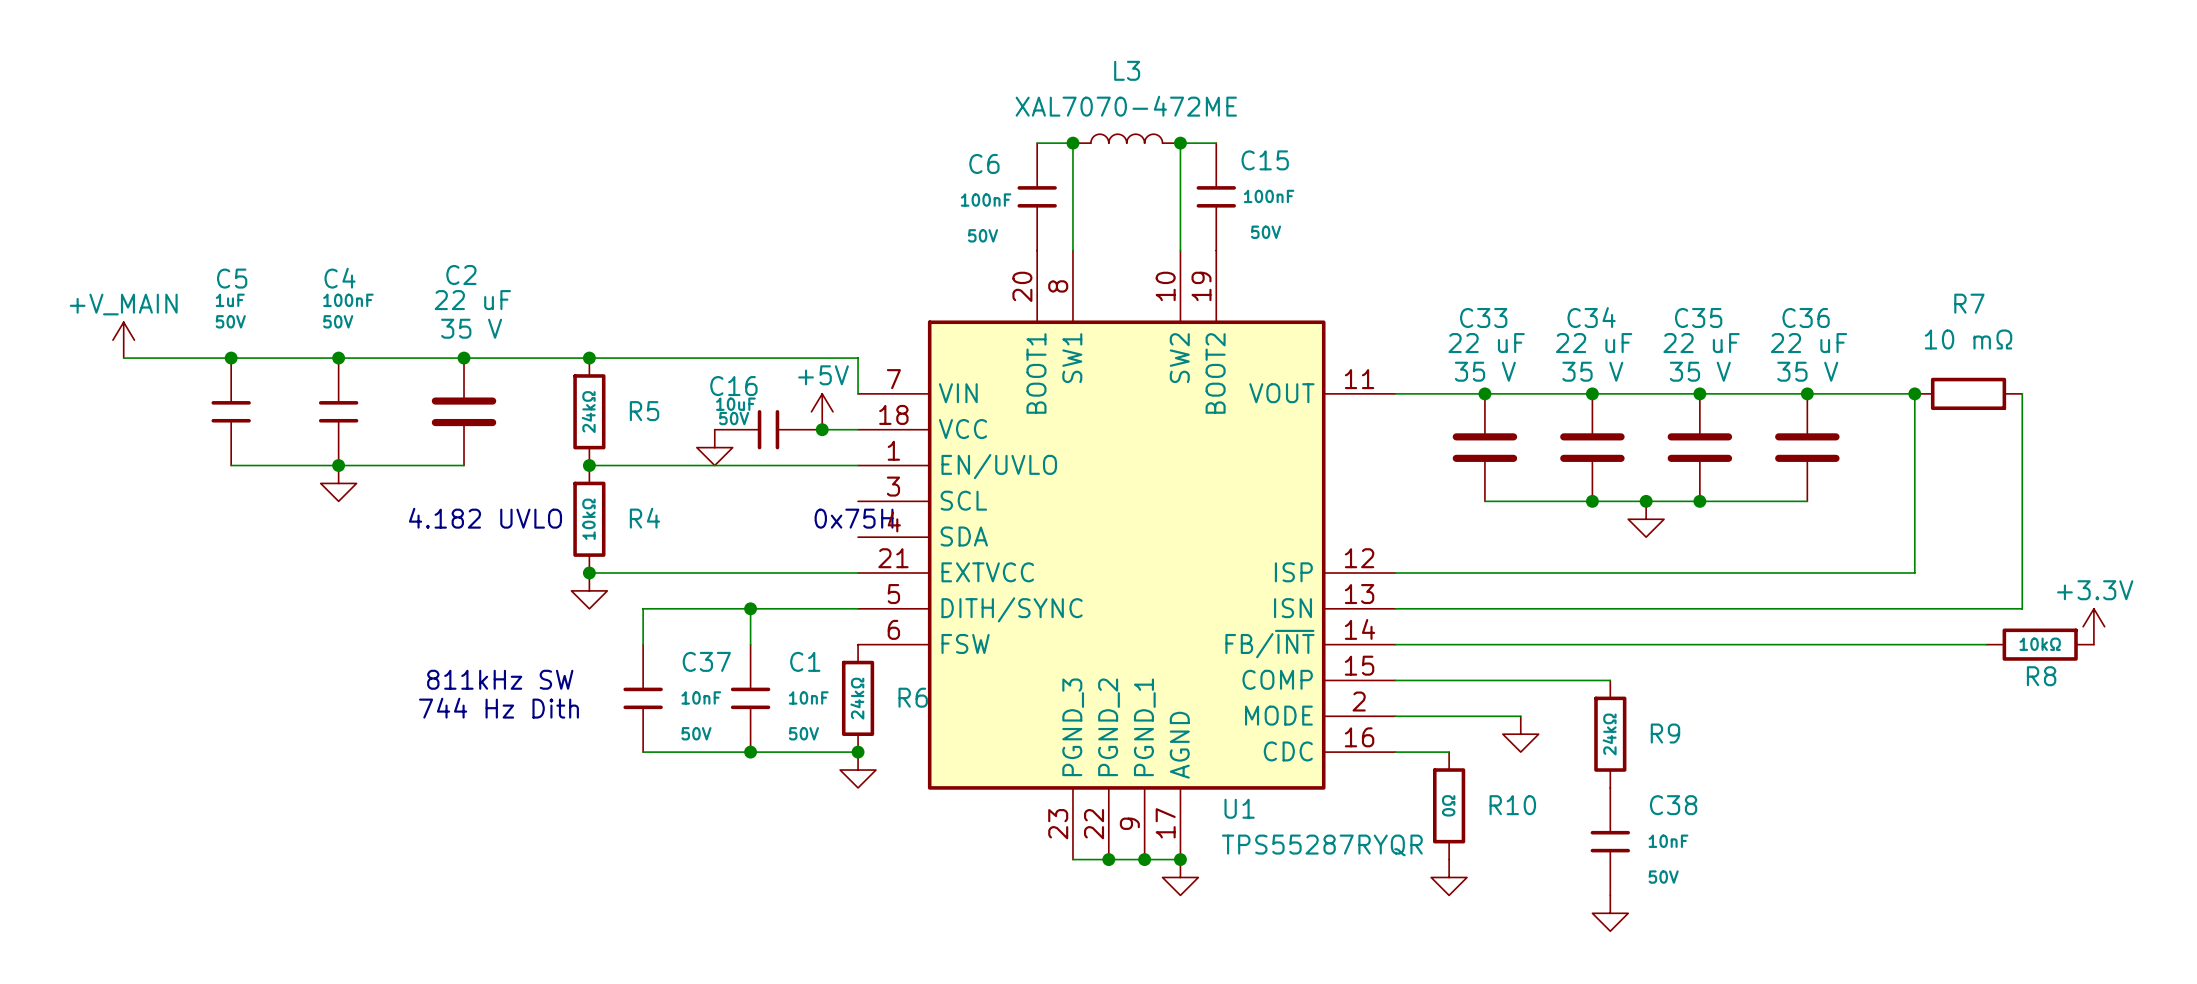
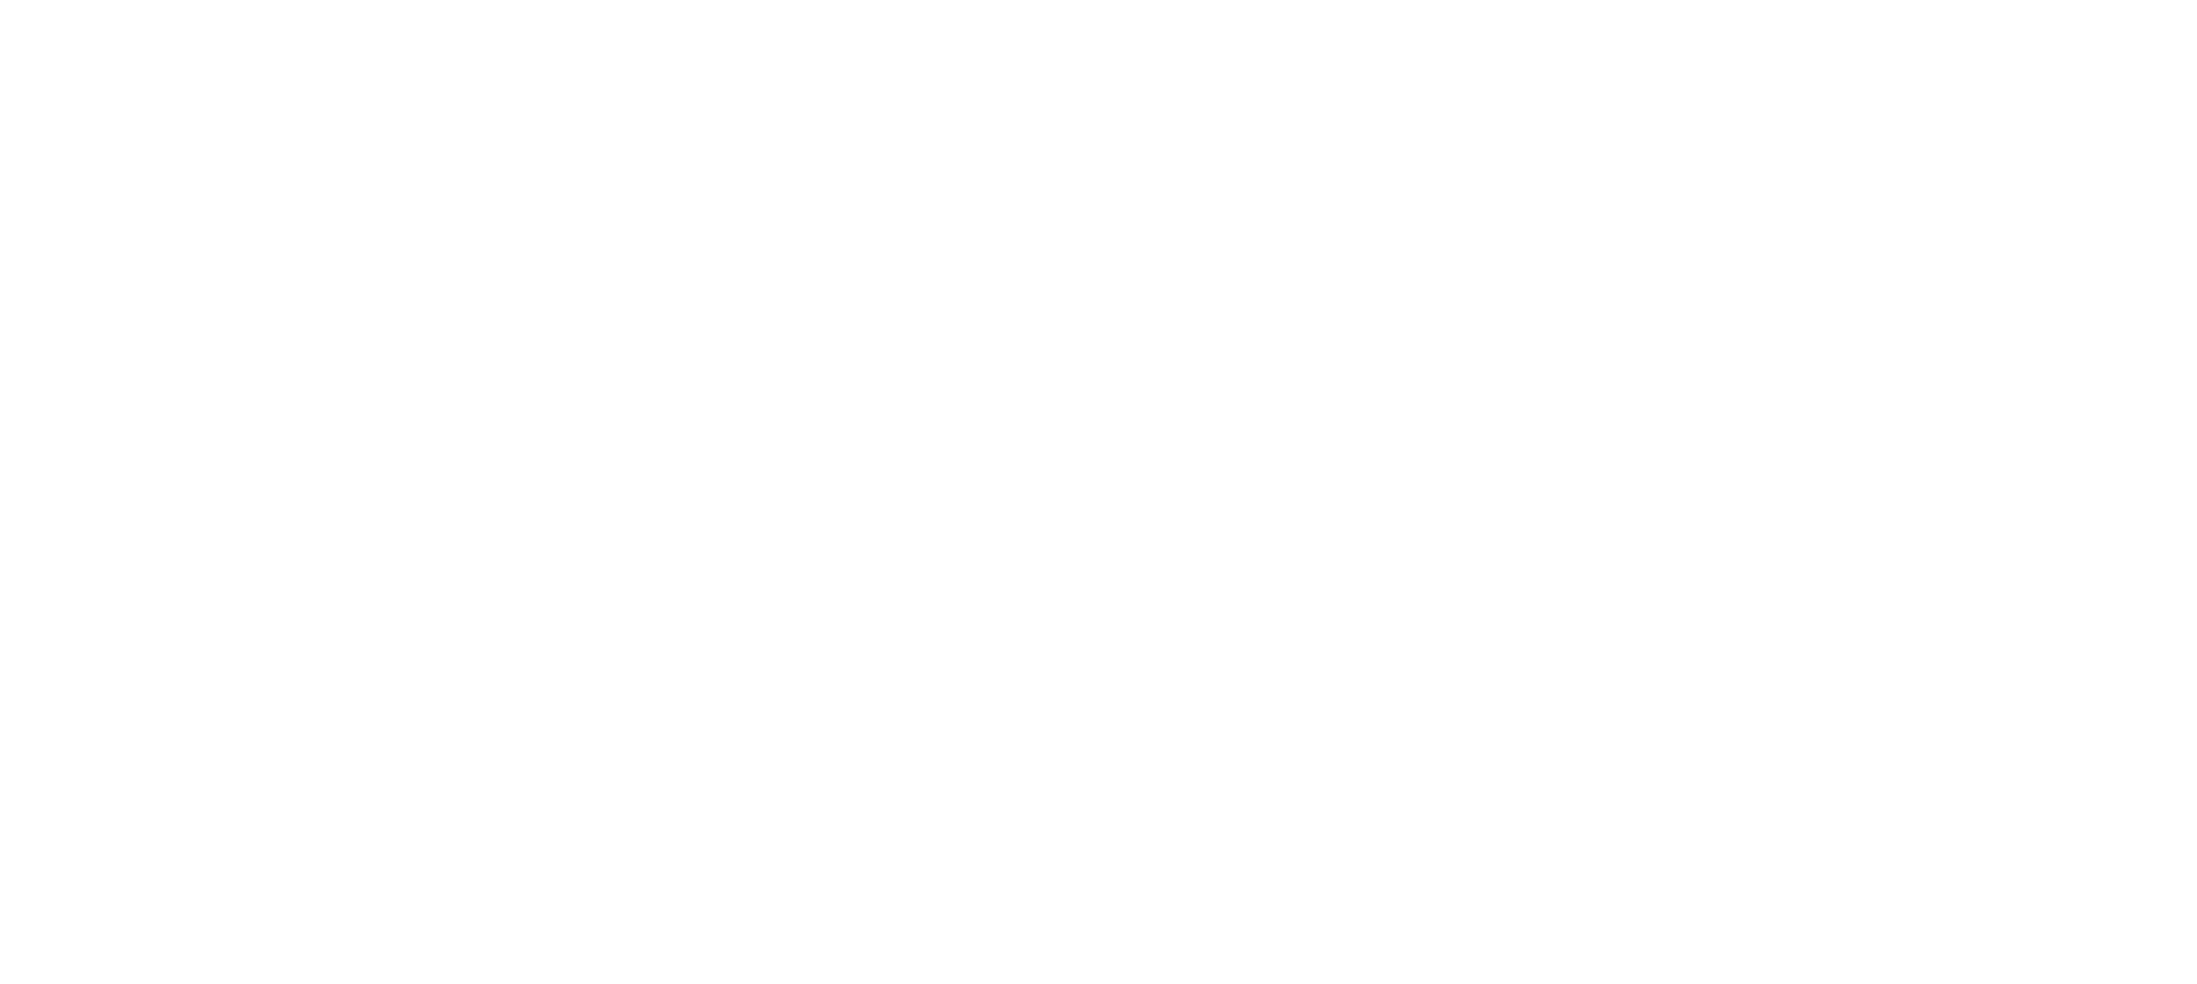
L3: XAL7070-472ME (1126, 138) -> none
wire: (1037, 143) (1072, 143) (1072, 250) -> none
junction: (1072, 143) -> none
junction: (1180, 143) -> none
wire: (1216, 143) (1180, 143) (1180, 250) -> none
C6: 100nF (1037, 196) -> none
C15: 100nF (1216, 196) -> none
power symbol: +V_MAIN (123, 340) -> none
wire: (123, 358) (858, 358) (858, 393) -> none
junction: (231, 358) -> none
junction: (338, 358) -> none
junction: (464, 358) -> none
junction: (589, 358) -> none
wire: (1395, 393) (1914, 393) (1914, 572) (1395, 572) -> none
junction: (1484, 393) -> none
junction: (1592, 393) -> none
junction: (1699, 393) -> none
junction: (1807, 393) -> none
junction: (1914, 393) -> none
R7: 10 mΩ (1968, 393) -> none
wire: (2022, 393) (2022, 608) (1395, 608) -> none
C5: 1uF (231, 411) -> none
C4: 100nF (338, 411) -> none
C2: 22 uF (464, 411) -> none
R5: 24kΩ (589, 411) -> none
power symbol: +5V (822, 411) -> none
C16: 10uF (768, 429) -> none
wire: (822, 429) (858, 429) -> none
junction: (822, 429) -> none
power symbol: (714, 447) -> none
C33: 22 uF (1484, 447) -> none
C34: 22 uF (1592, 447) -> none
C35: 22 uF (1699, 447) -> none
C36: 22 uF (1807, 447) -> none
wire: (231, 465) (464, 465) -> none
junction: (338, 465) -> none
wire: (589, 465) (858, 465) -> none
junction: (589, 465) -> none
power symbol: (338, 483) -> none
wire: (1484, 501) (1807, 501) -> none
junction: (1592, 501) -> none
junction: (1646, 501) -> none
junction: (1699, 501) -> none
text: 4.182 UVLO (485, 518) -> none
text: 0x75H (854, 518) -> none
R4: 10kΩ (589, 519) -> none
power symbol: (1646, 519) -> none
U1: TPS55287RYQR (1126, 555) -> none
wire: (589, 572) (858, 572) -> none
junction: (589, 572) -> none
power symbol: (589, 590) -> none
wire: (750, 608) (750, 644) -> none
junction: (750, 608) -> none
wire: (858, 608) (643, 608) (643, 644) -> none
power symbol: +3.3V (2093, 626) -> none
wire: (1395, 644) (1986, 644) -> none
R8: 10kΩ (2040, 644) -> none
text: 811kHz SW (500, 679) -> none
wire: (1395, 680) (1610, 680) -> none
C37: 10nF (643, 698) -> none
C1: 10nF (750, 698) -> none
R6: 24kΩ (858, 698) -> none
text: 744 Hz Dith (498, 708) -> none
wire: (1395, 716) (1520, 716) -> none
power symbol: (1520, 734) -> none
R9: 24kΩ (1610, 734) -> none
wire: (643, 752) (858, 752) -> none
junction: (750, 752) -> none
junction: (858, 752) -> none
wire: (1395, 752) (1449, 752) -> none
power symbol: (858, 770) -> none
R10: 0Ω (1449, 805) -> none
C38: 10nF (1610, 841) -> none
wire: (1072, 859) (1180, 859) -> none
junction: (1108, 859) -> none
junction: (1144, 859) -> none
junction: (1180, 859) -> none
power symbol: (1180, 877) -> none
power symbol: (1449, 877) -> none
power symbol: (1610, 913) -> none

